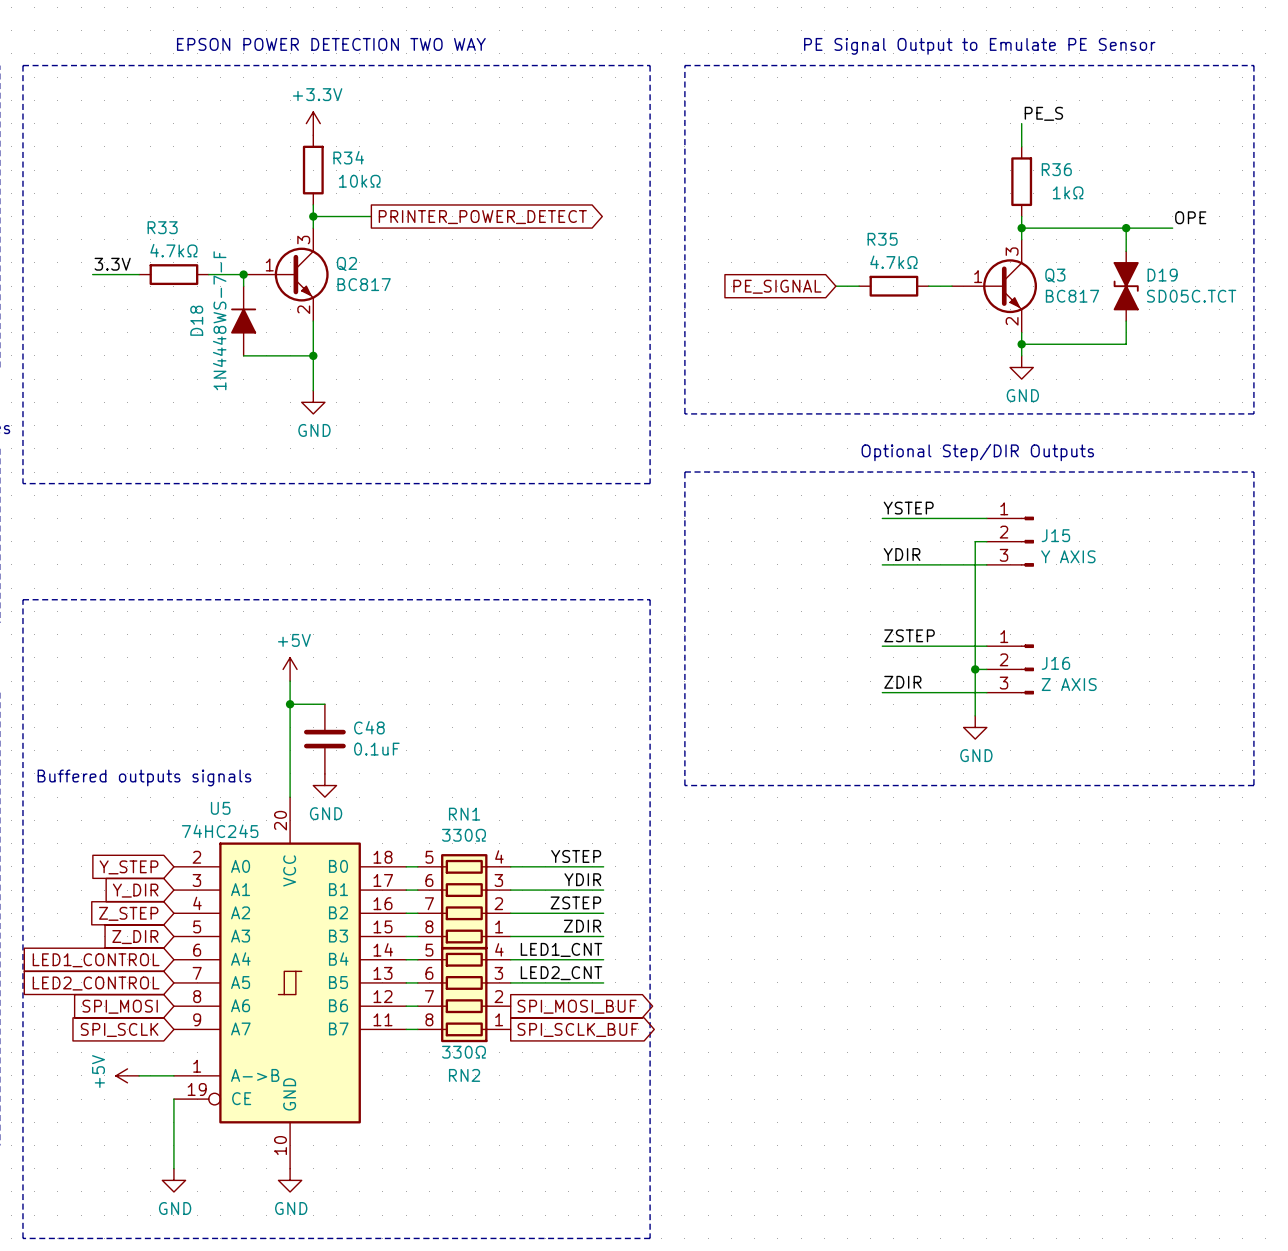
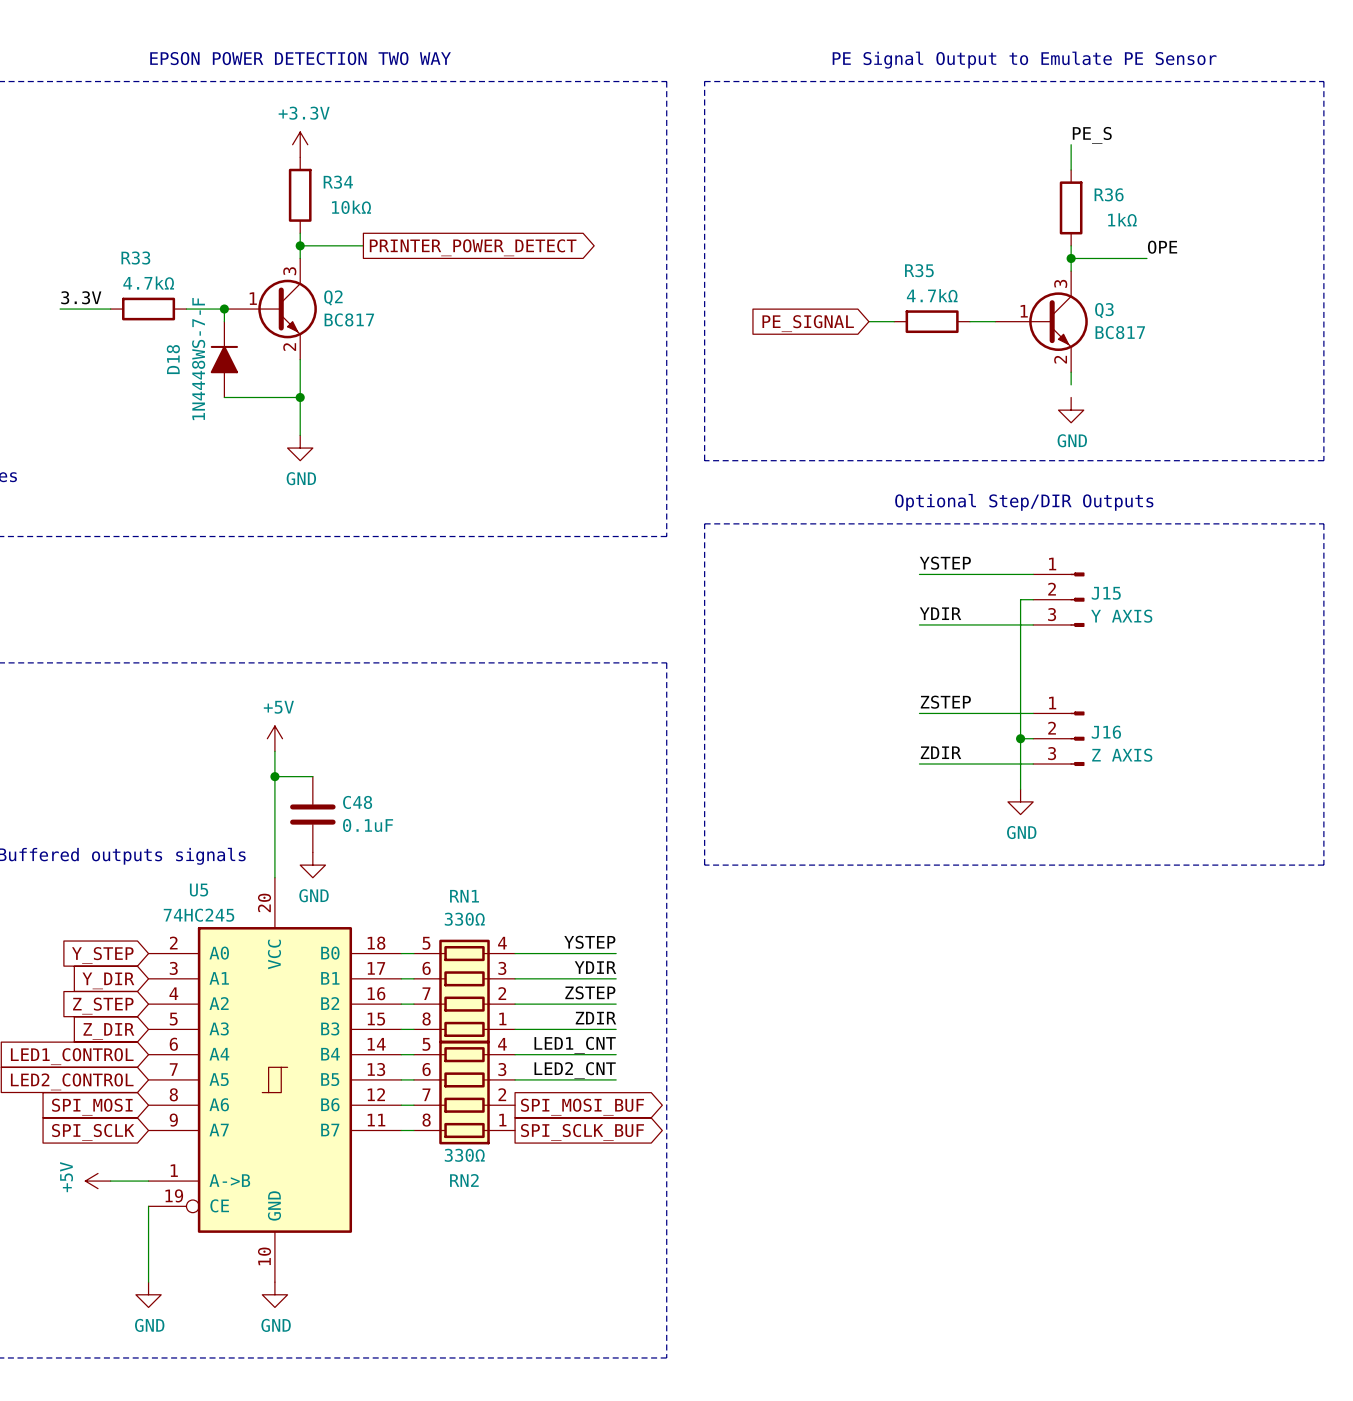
label position: OPE (1190, 217) -> OPE (1162, 247)
wire: (1091, 228) (1172, 228) -> none
wire: (1126, 228) (1126, 251) -> none
junction: (1126, 228) -> none
D19: SD05C.TCT (1126, 286) -> none
wire: (1126, 321) (1126, 344) (1021, 344) (1021, 355) -> none
junction: (1021, 344) -> none

